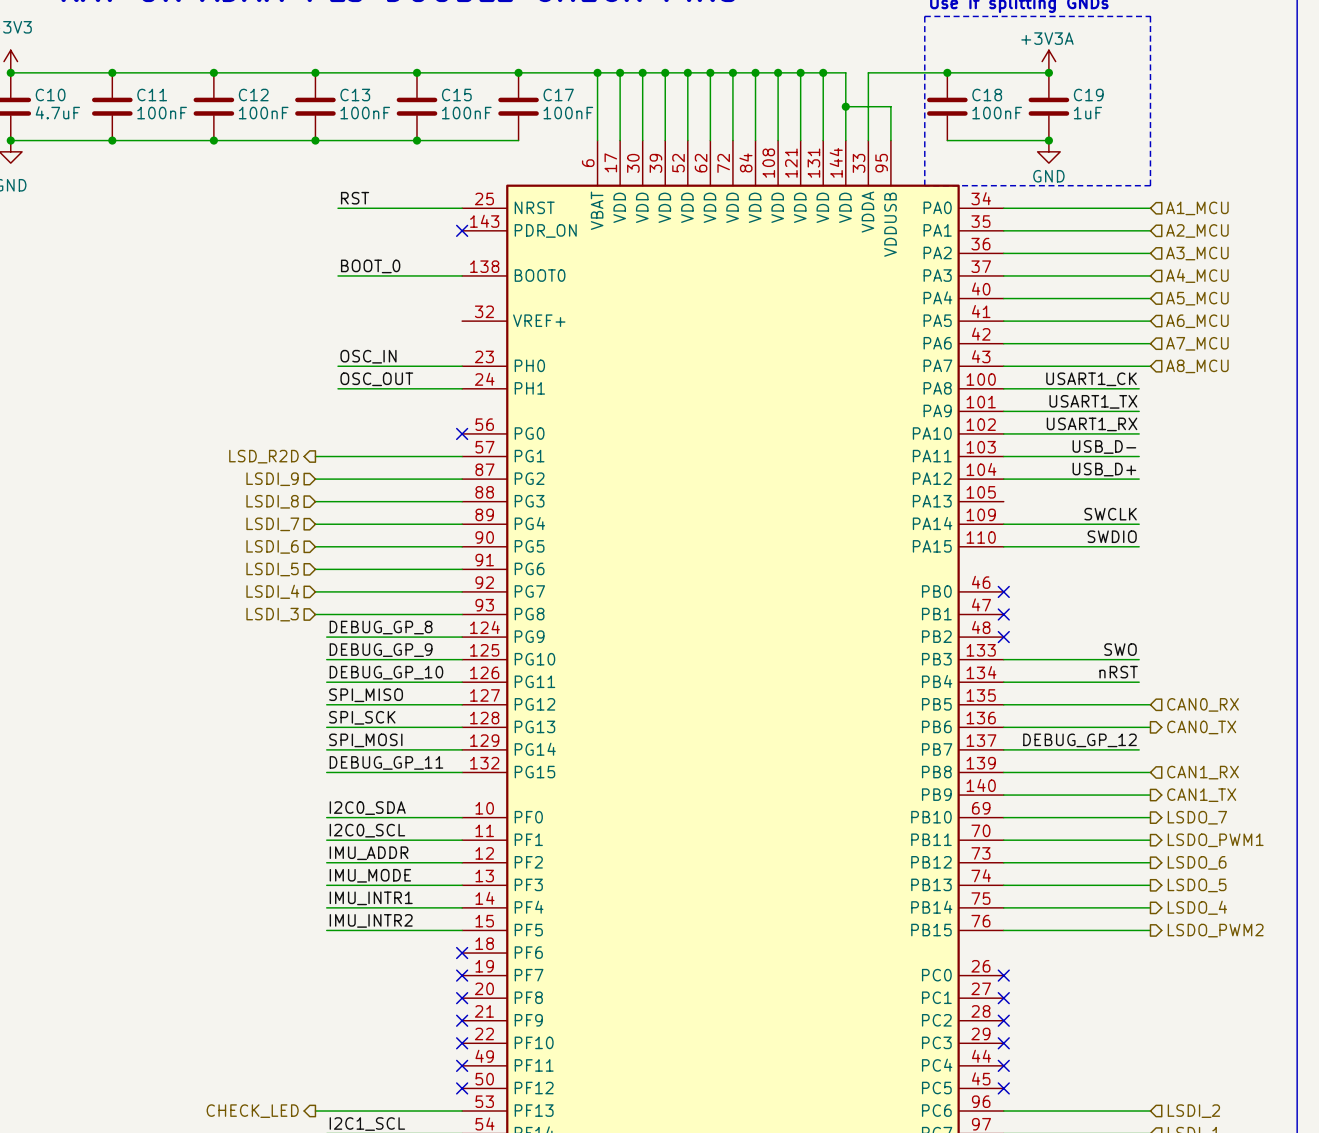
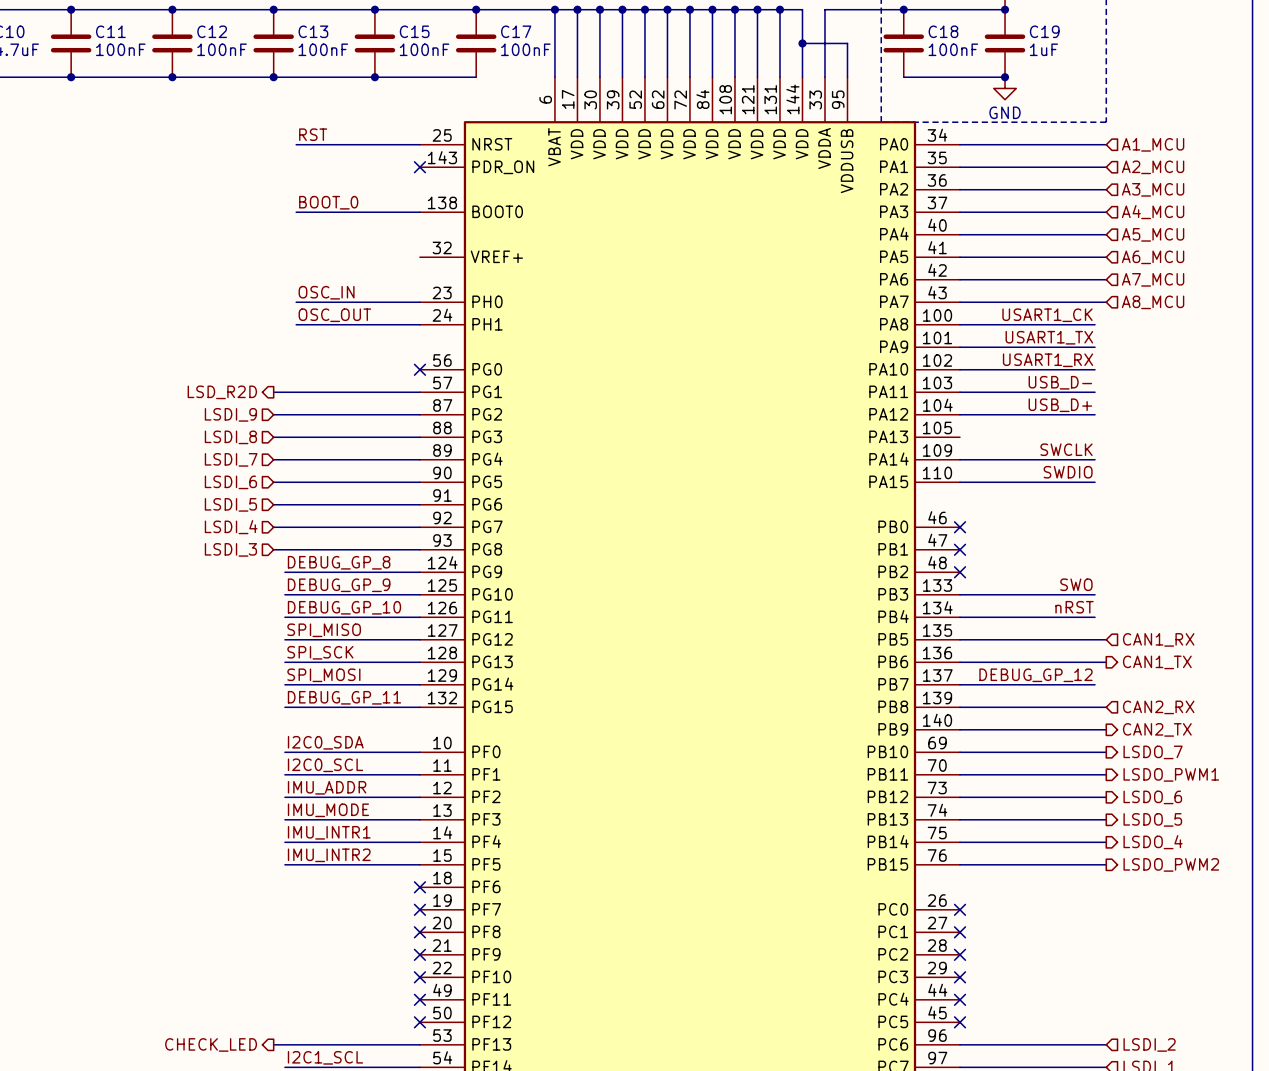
hierarchical label: CAN0_RX (1203, 704) -> CAN1_RX (1158, 639)
hierarchical label: CAN0_TX (1201, 727) -> CAN1_TX (1157, 662)
hierarchical label: CAN1_RX (1203, 772) -> CAN2_RX (1158, 707)
hierarchical label: CAN1_TX (1201, 795) -> CAN2_TX (1157, 729)

